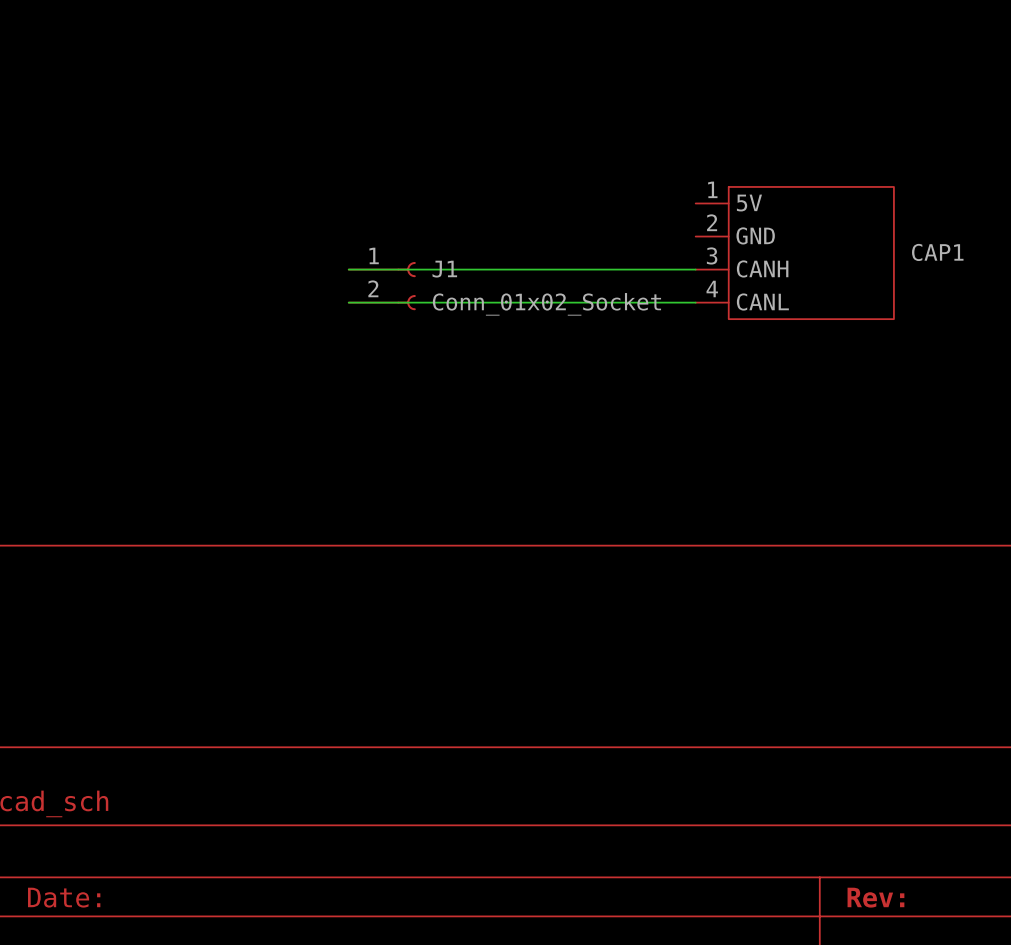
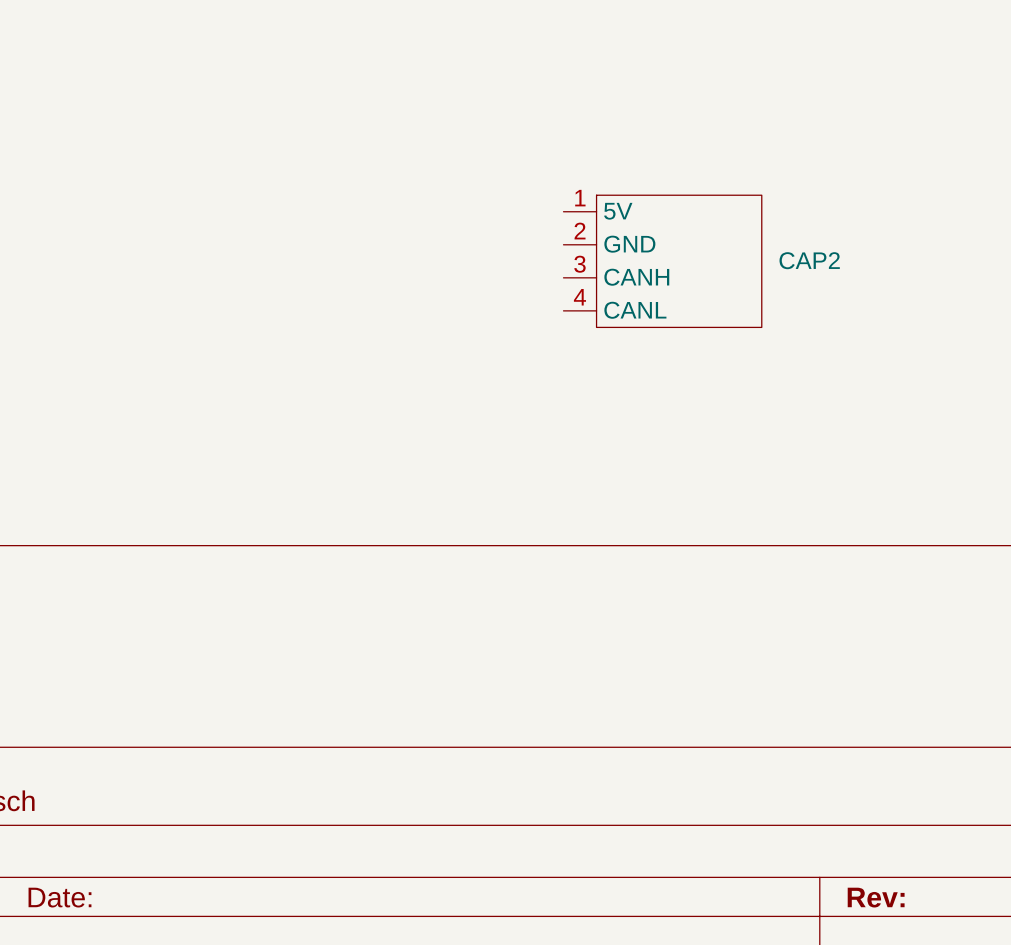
CAP1: (794, 253) -> none
CAP2: none -> (662, 261)
wire: (348, 269) (695, 269) -> none
J1: Conn_01x02_Socket (382, 286) -> none
wire: (348, 302) (695, 302) -> none

